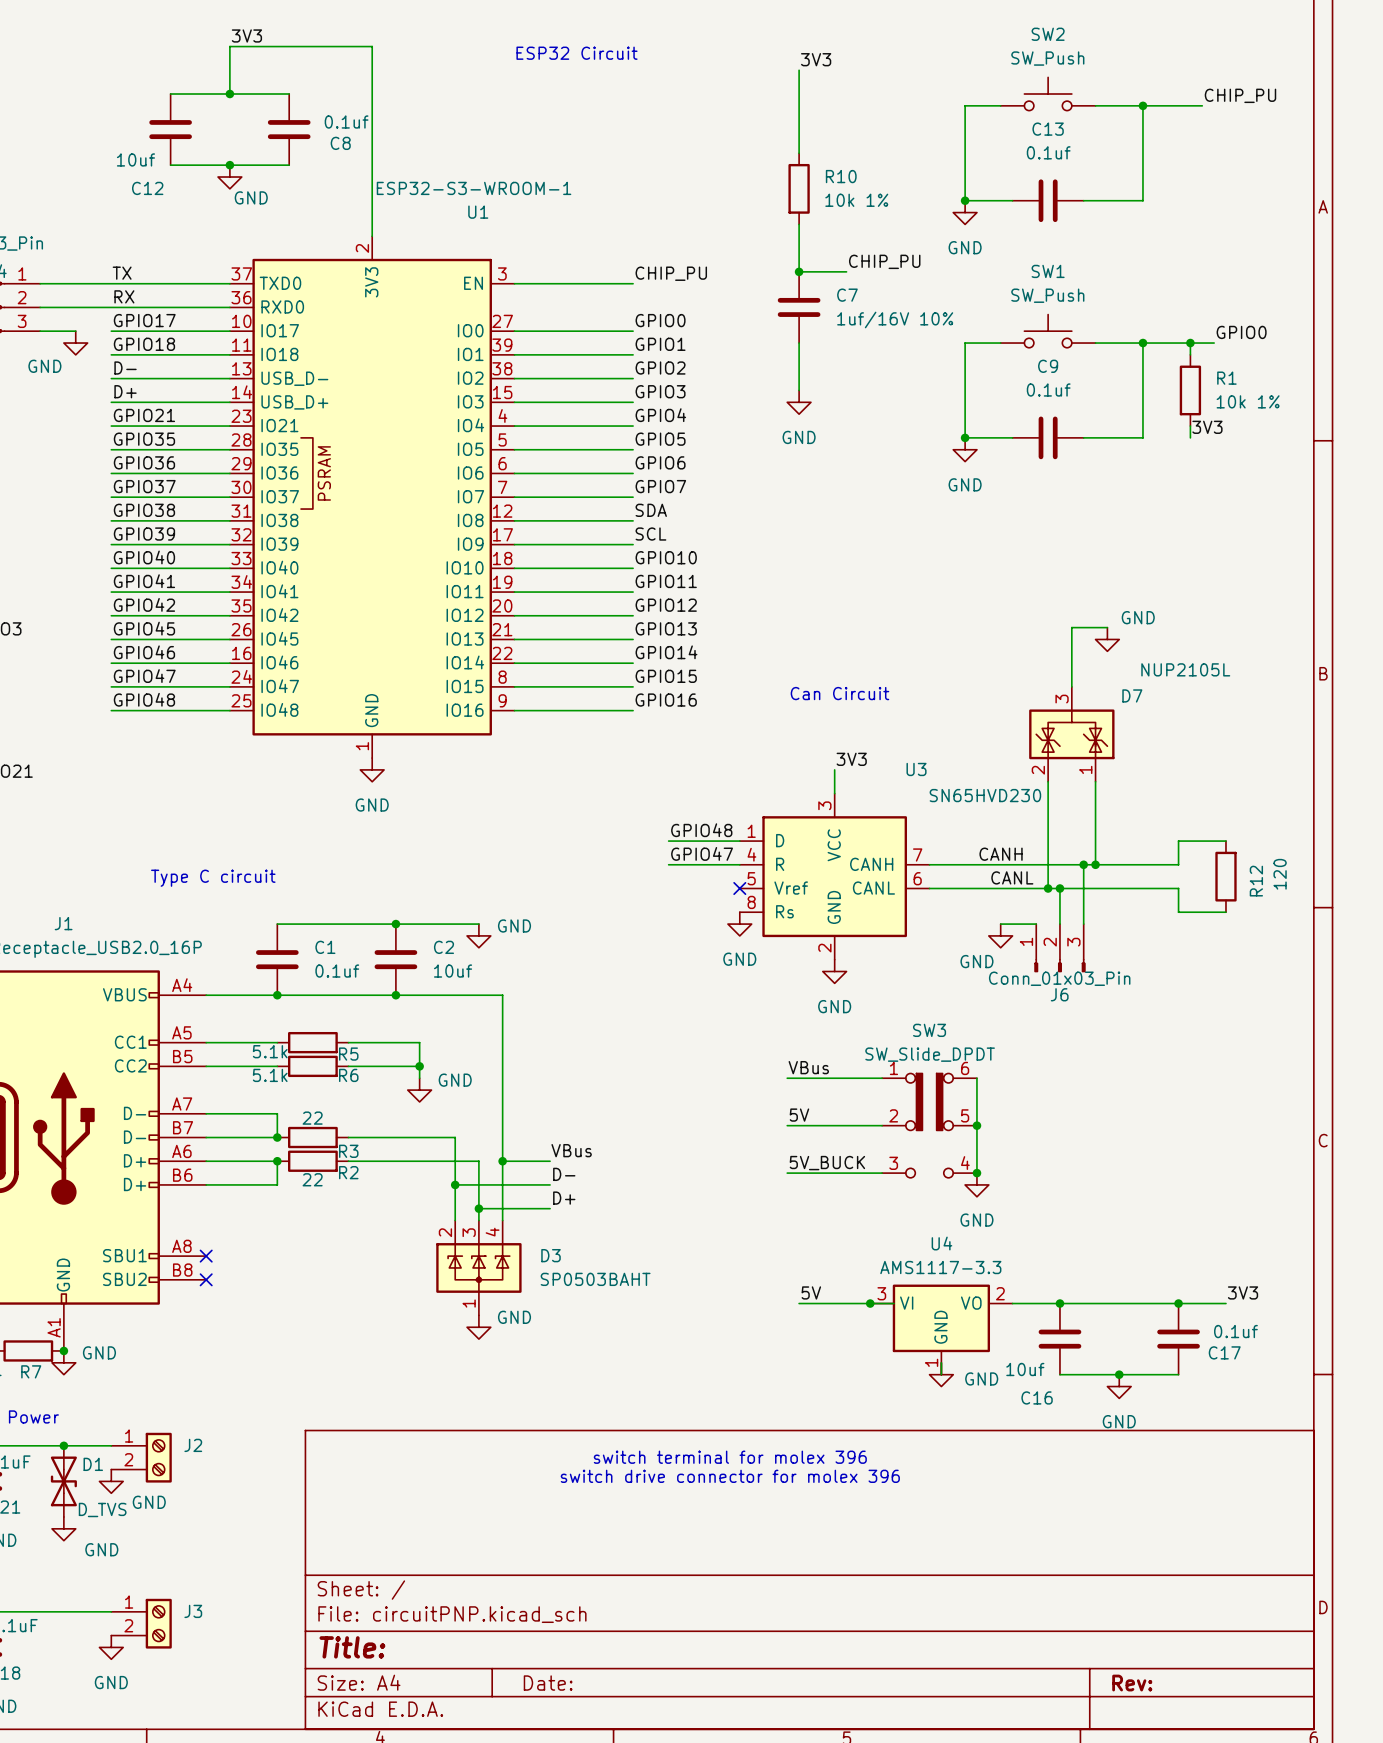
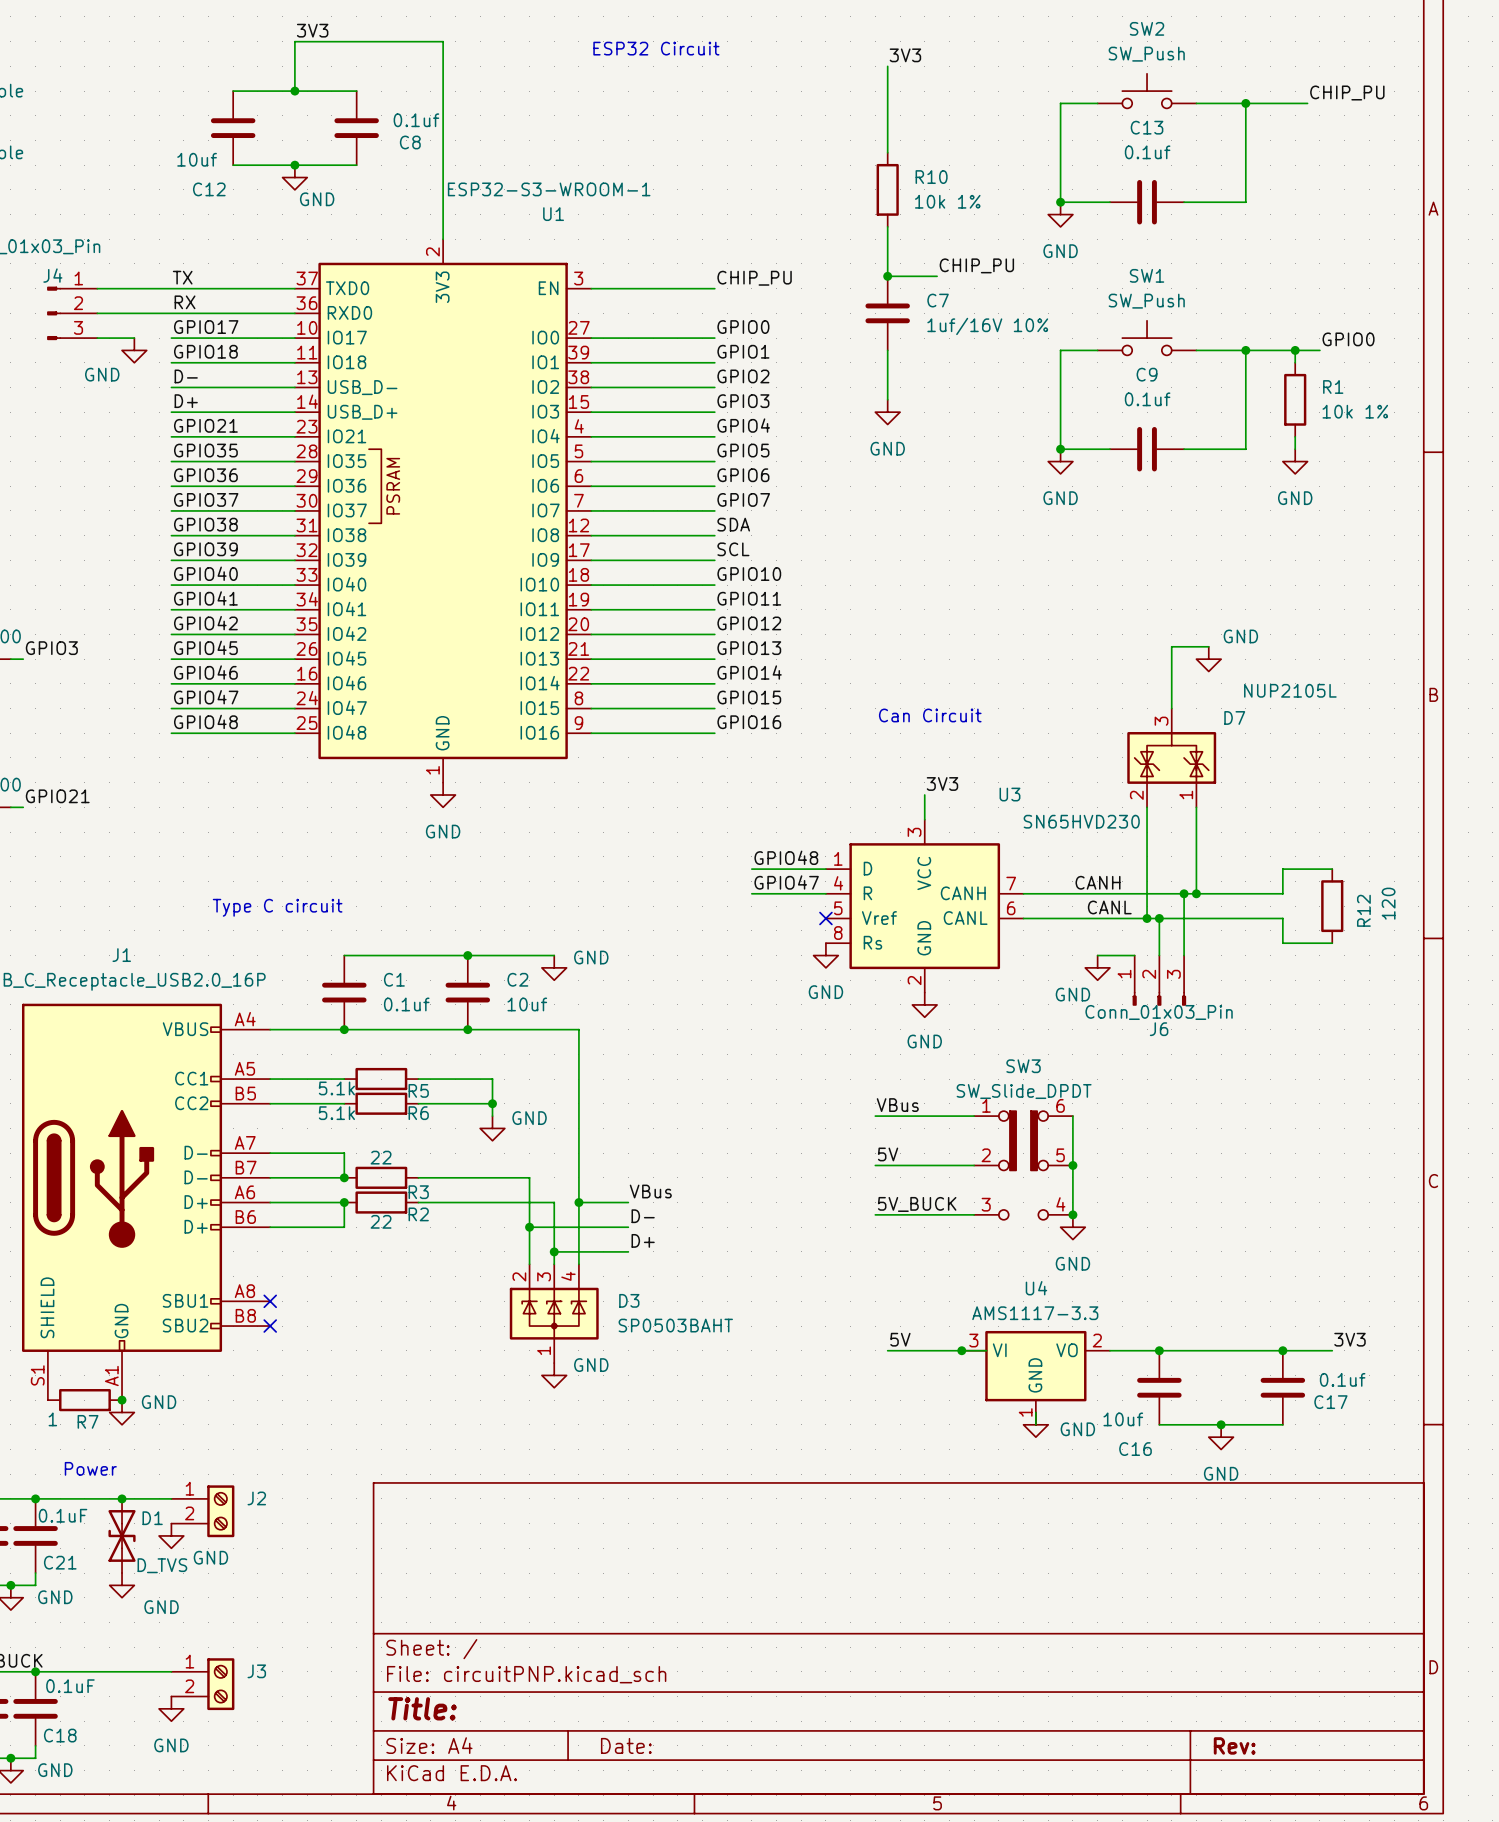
label: 3V3 (1207, 427) -> none
power symbol: none -> GND (1295, 461)
text: switch terminal for molex 396 (730, 1457) -> none
text: switch drive connector for molex 396 (730, 1476) -> none

